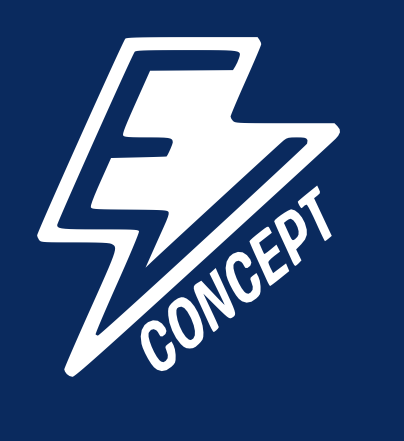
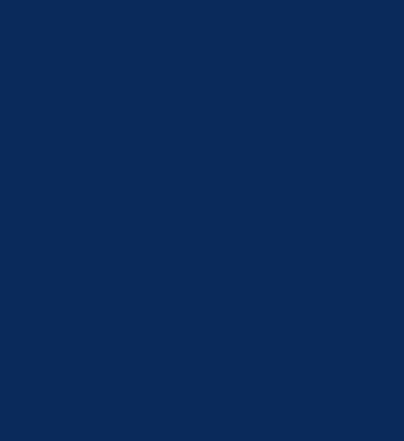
drawing: [37, 37, 340, 377] -> none

